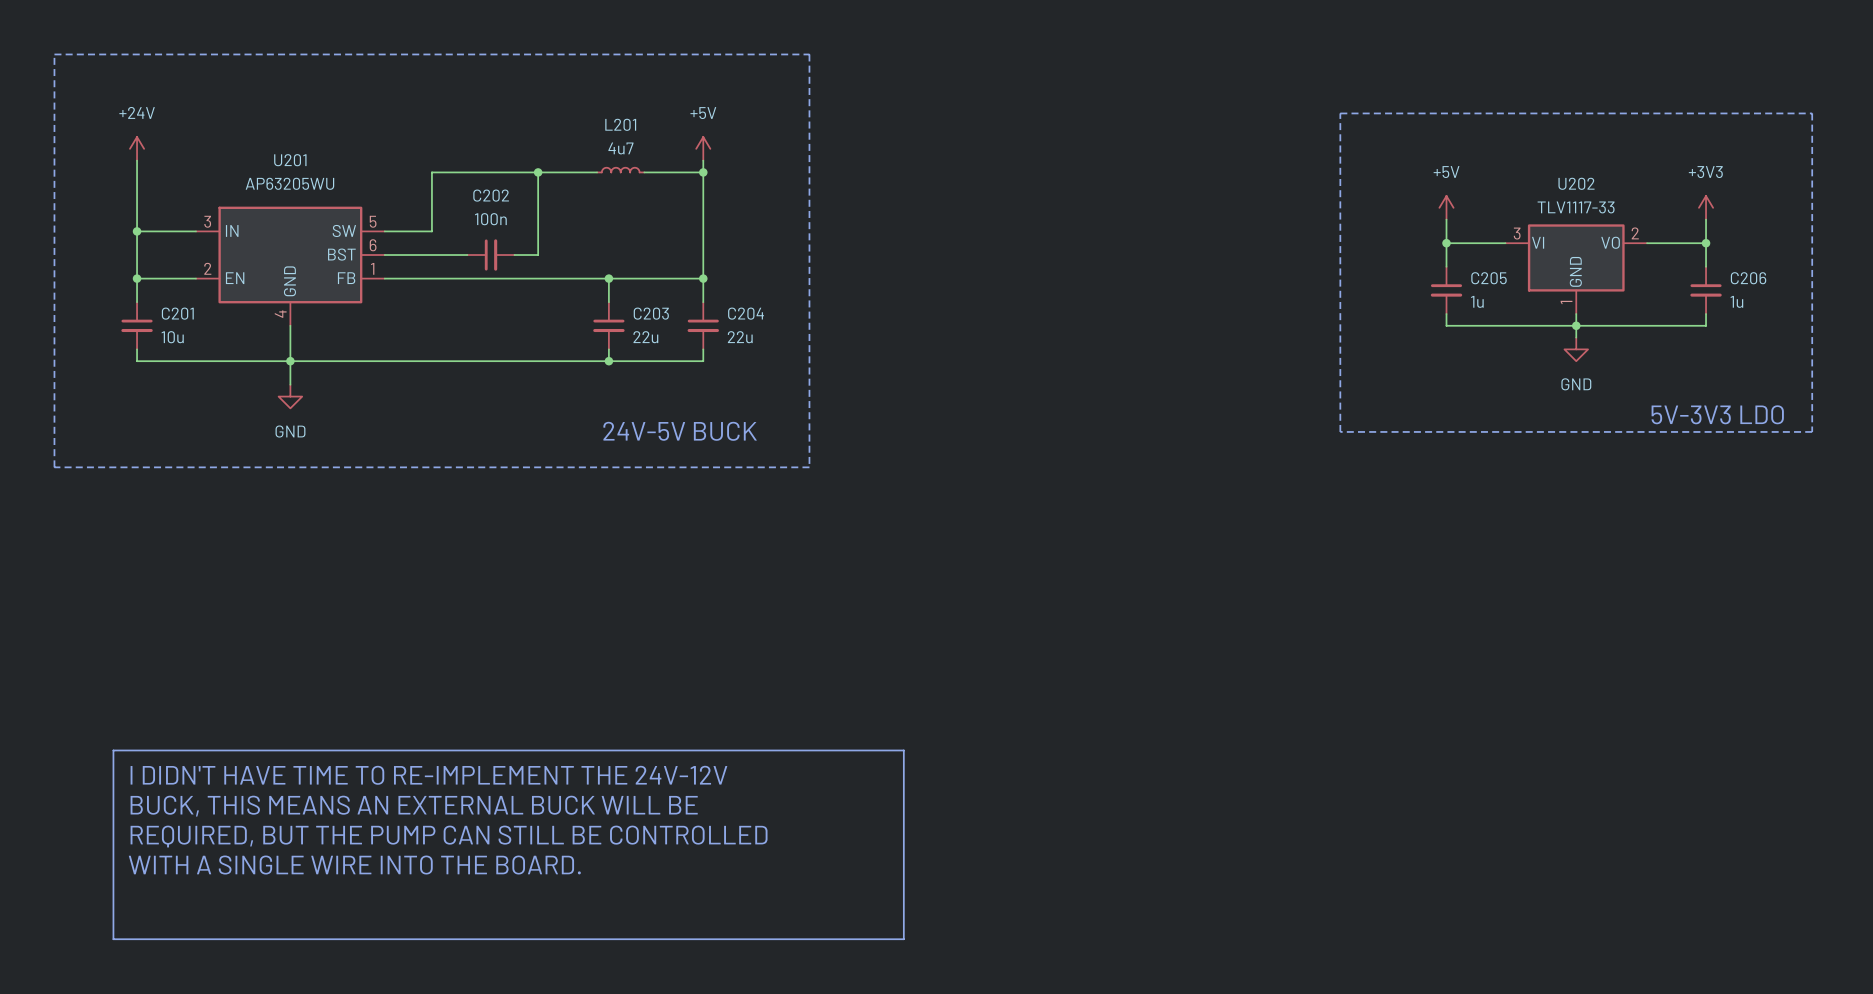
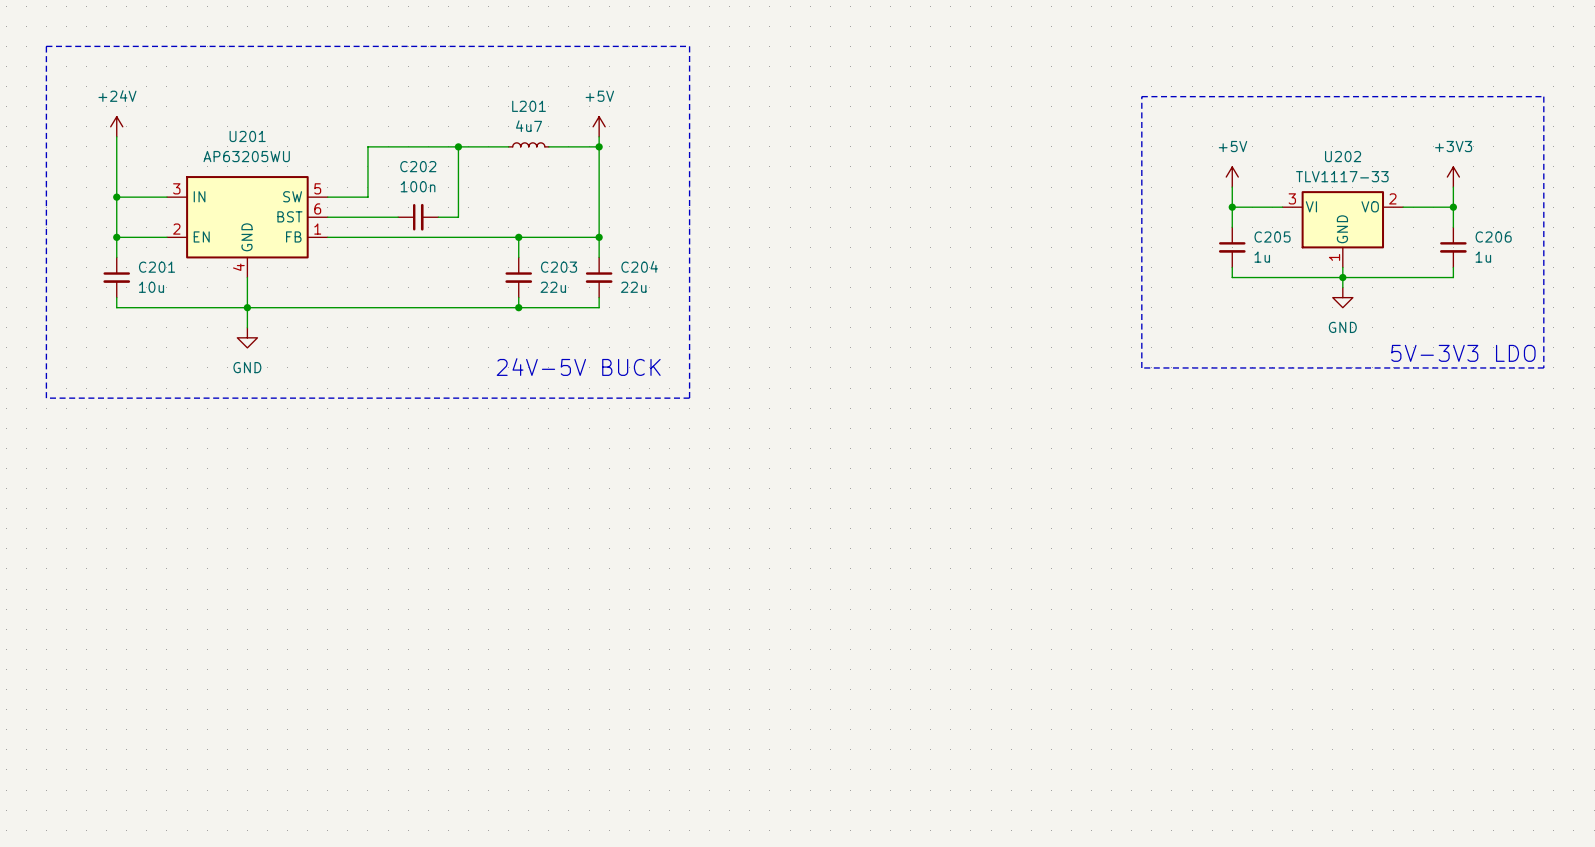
line: (113, 750) (903, 750) (903, 939) (113, 939) (113, 750) -> none
text: I DIDN'T HAVE TIME TO RE-IMPLEMENT THE 24V-12V (428, 775) -> none
text: BUCK, THIS MEANS AN EXTERNAL BUCK WILL BE (414, 806) -> none
text: REQUIRED, BUT THE PUMP CAN STILL BE CONTROLLED (449, 836) -> none
text: WITH A SINGLE WIRE INTO THE BOARD. (354, 865) -> none

